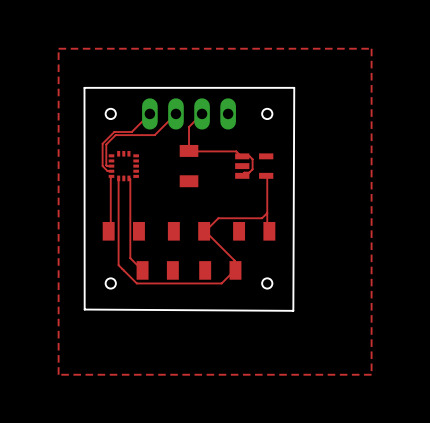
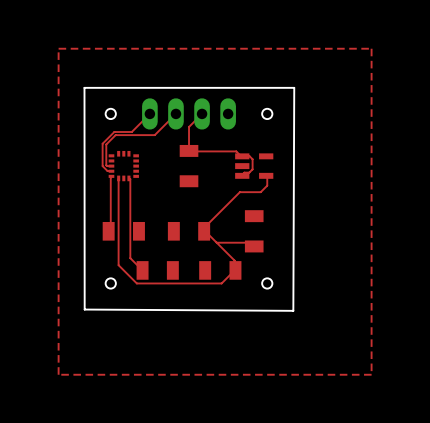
top track: (267, 185) (267, 231) (269, 231) -> (267, 185) (260, 192) (239, 192) (204, 227) (204, 231)
top track: (267, 213) (262, 218) (218, 218) (205, 231) -> none
part rotation: 0° (254, 231) -> 90° clockwise (254, 231)
top track: none -> (216, 242) (250, 242) (254, 246)

